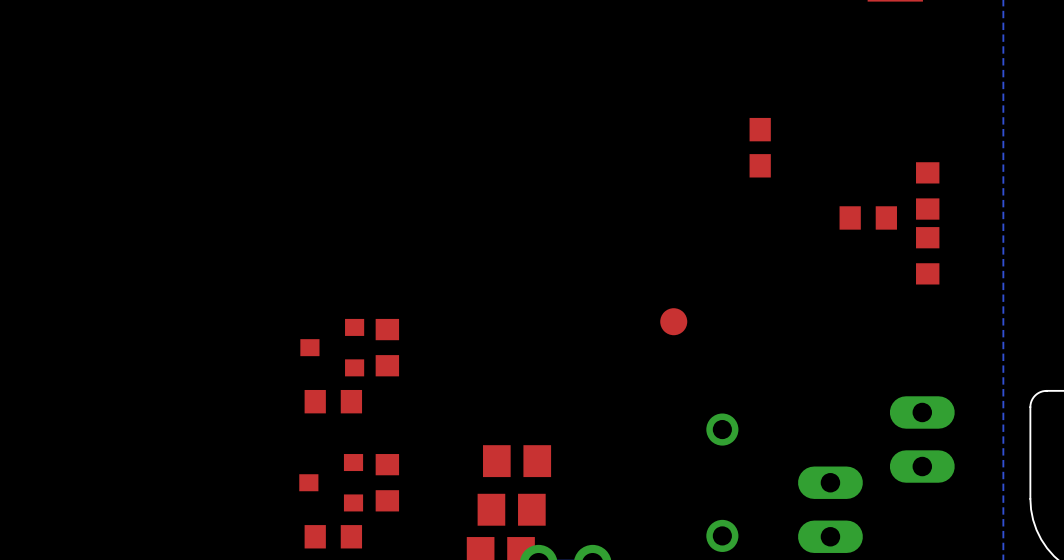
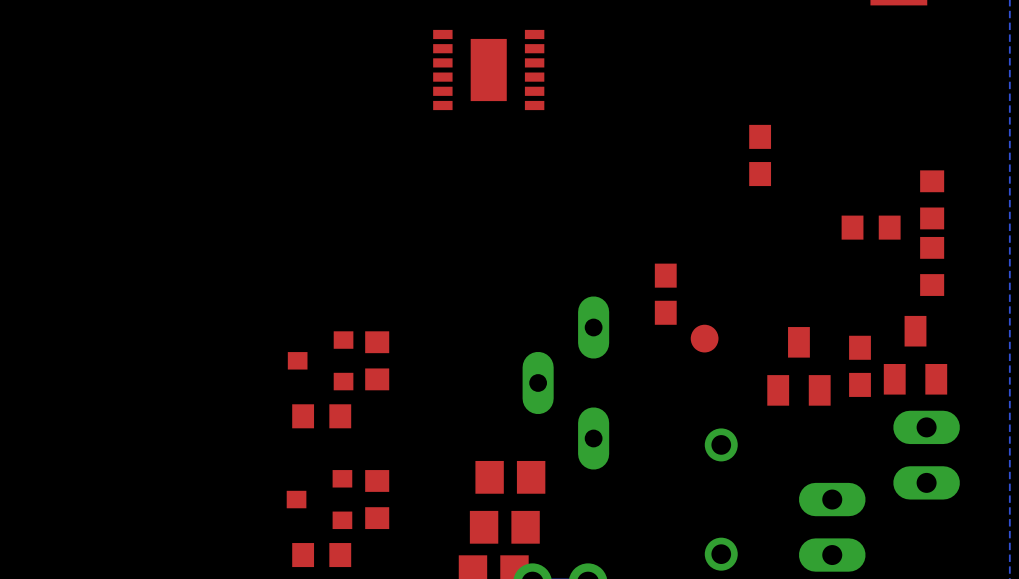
part: none -> (488, 70)
part: none -> (665, 294)
part position: (673, 321) -> (704, 338)
part: none -> (915, 355)
part: none -> (798, 366)
part: none -> (860, 366)
part: none -> (565, 383)

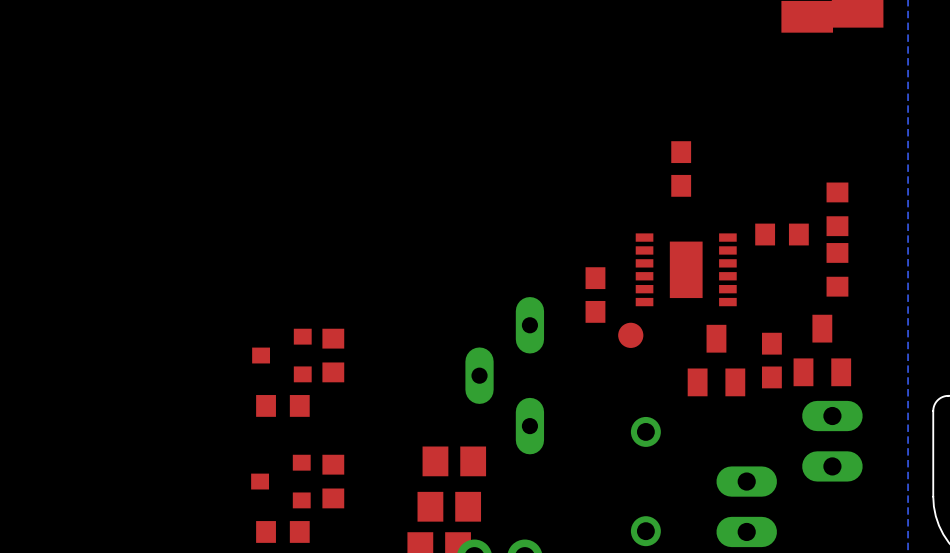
part position: (488, 70) -> (686, 269)

